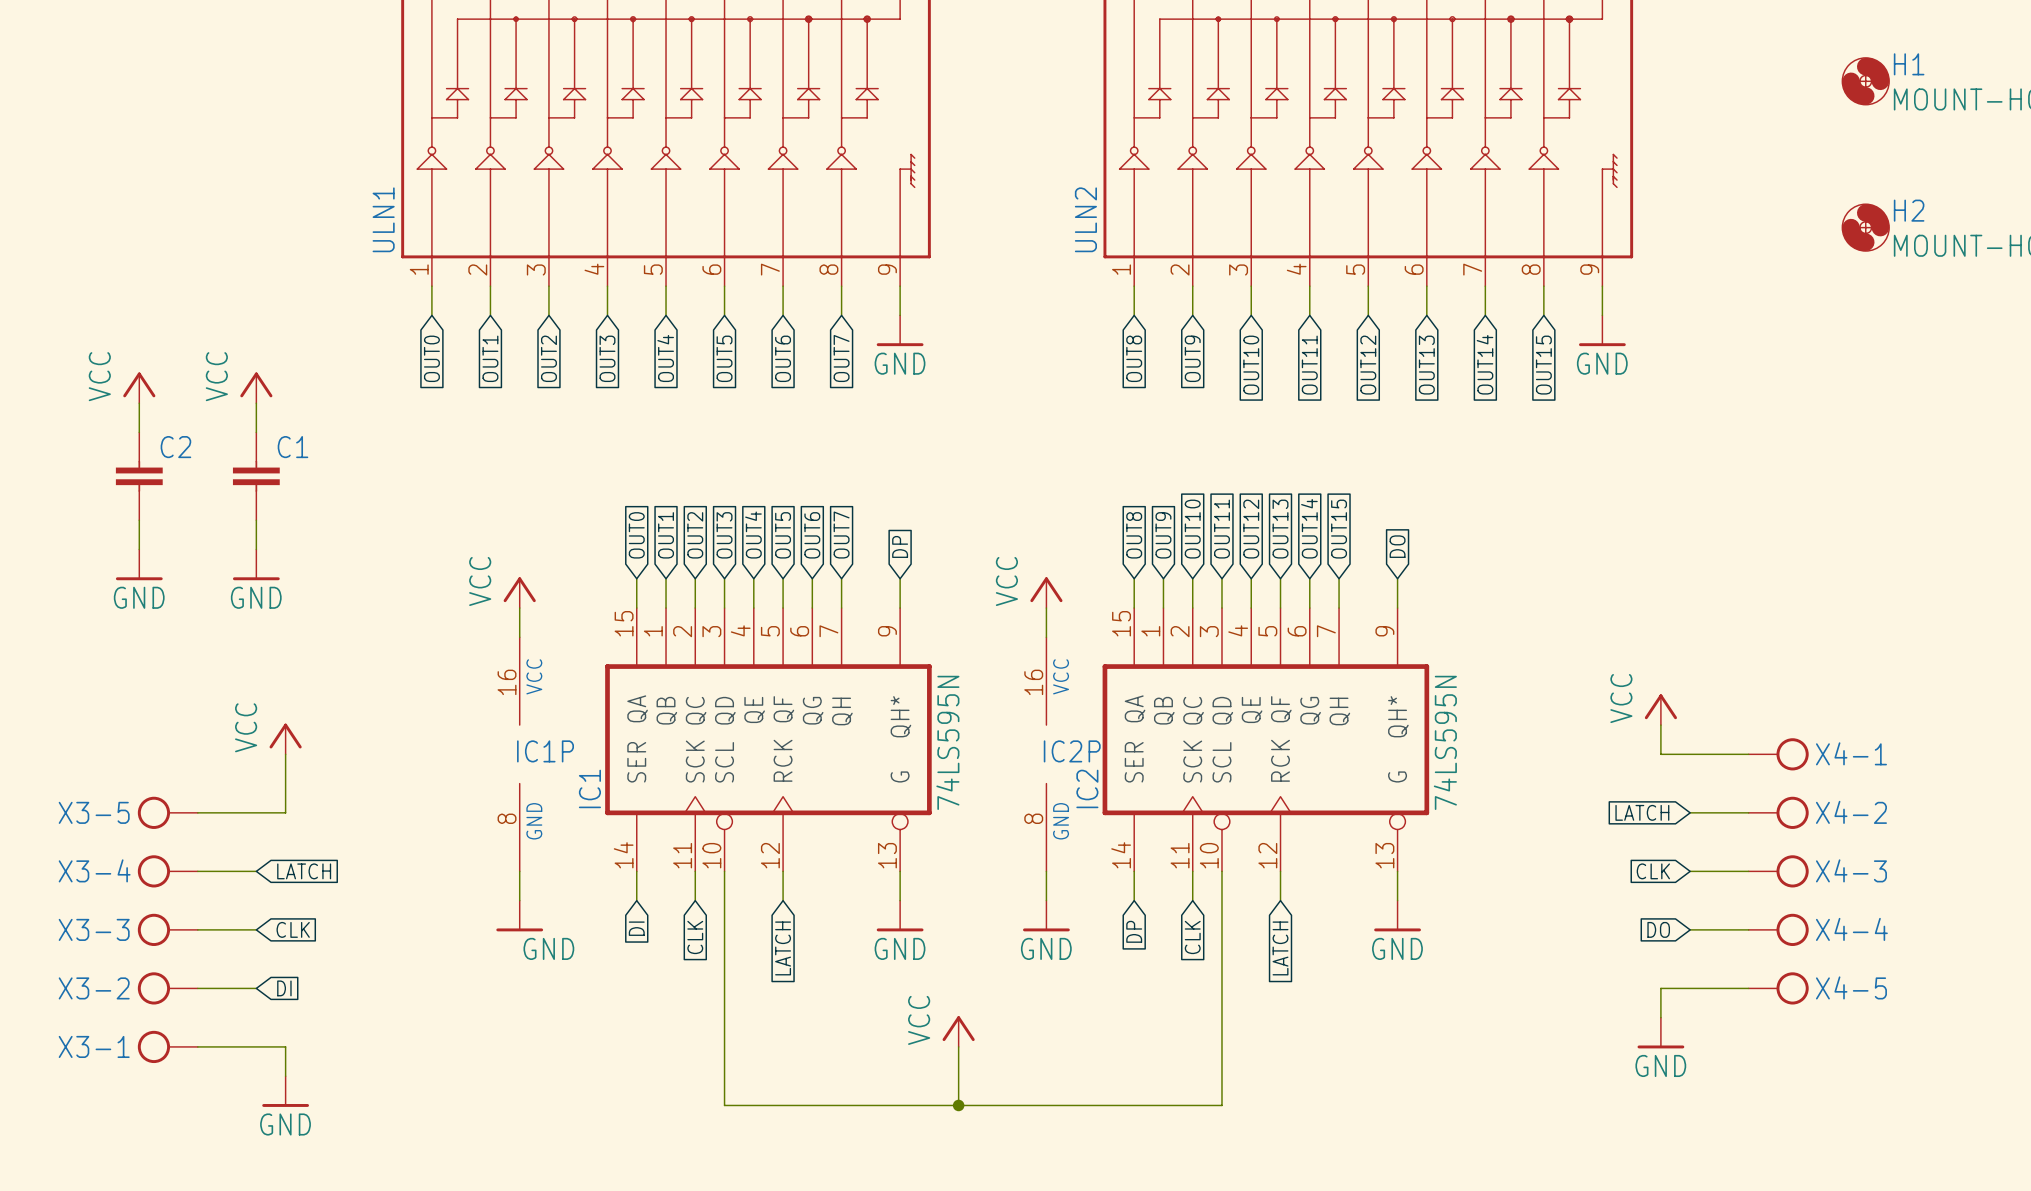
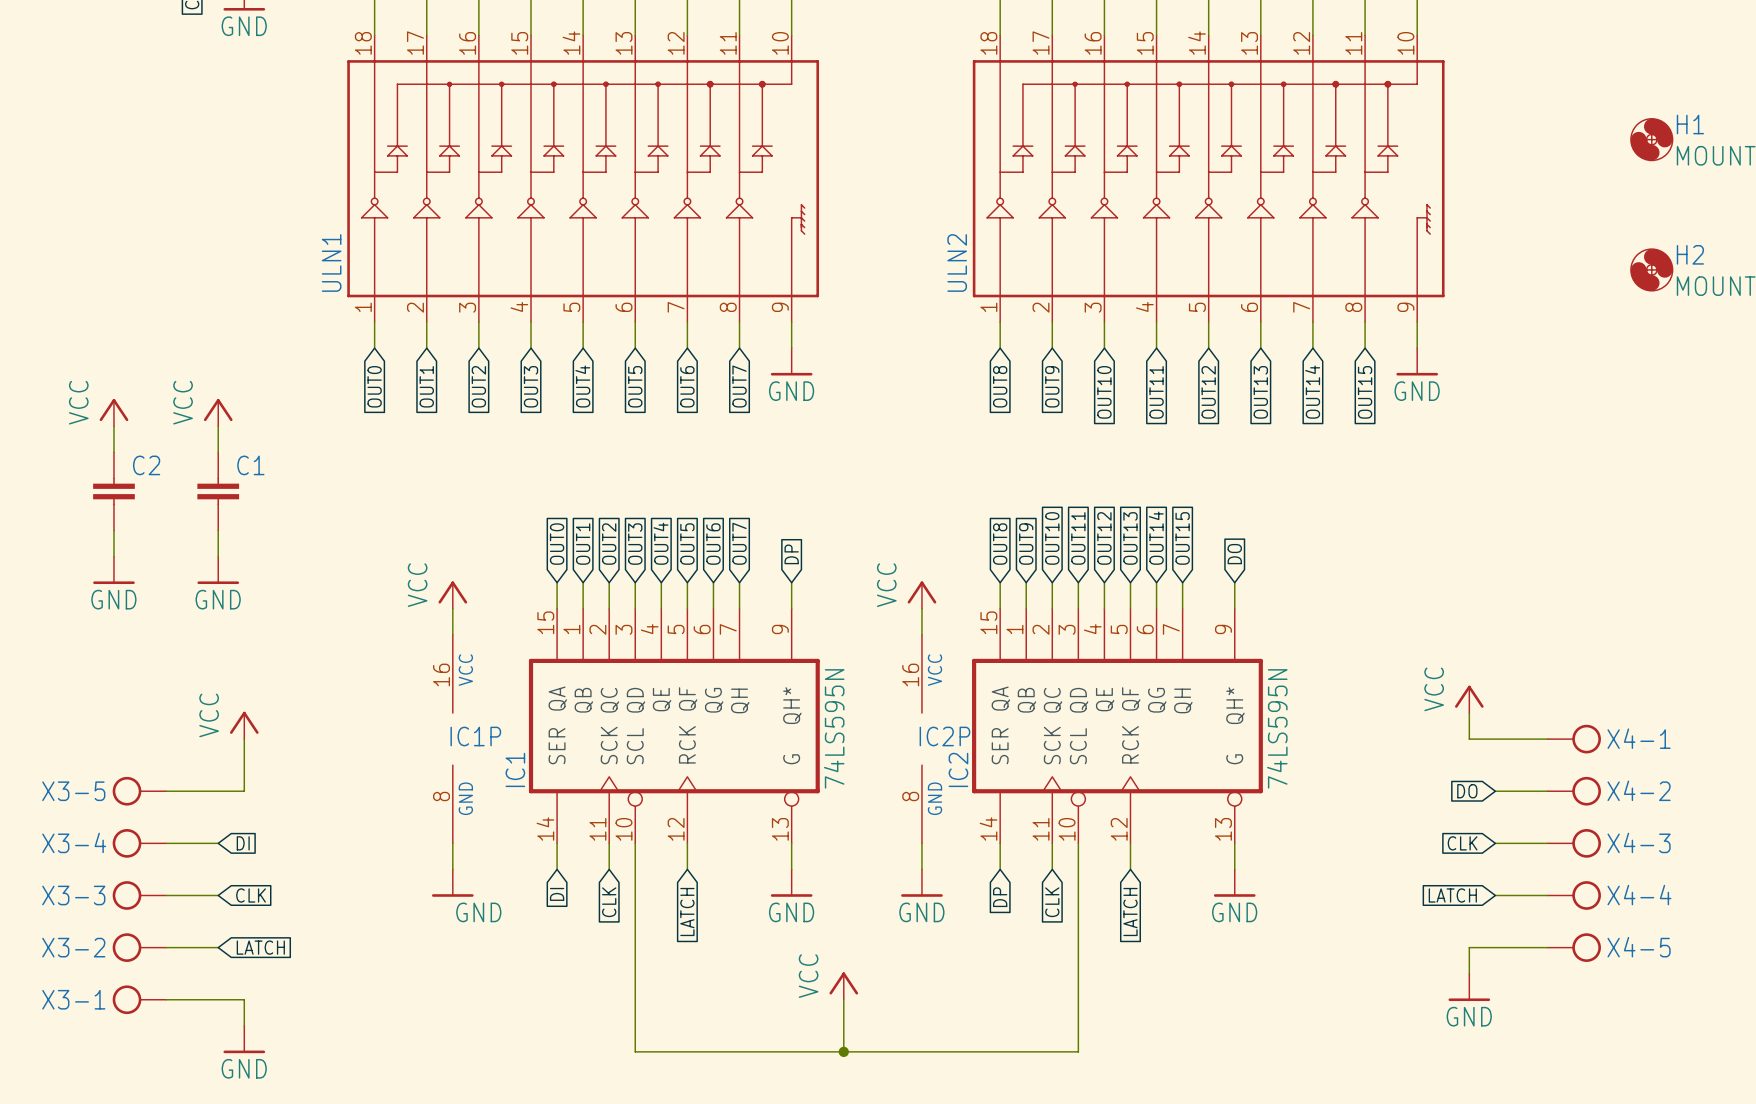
global label: LATCH (1642, 812) -> DO (1467, 791)
global label: LATCH (304, 871) -> DI (243, 843)
global label: DO (1658, 929) -> LATCH (1452, 895)
global label: DI (284, 988) -> LATCH (260, 947)

